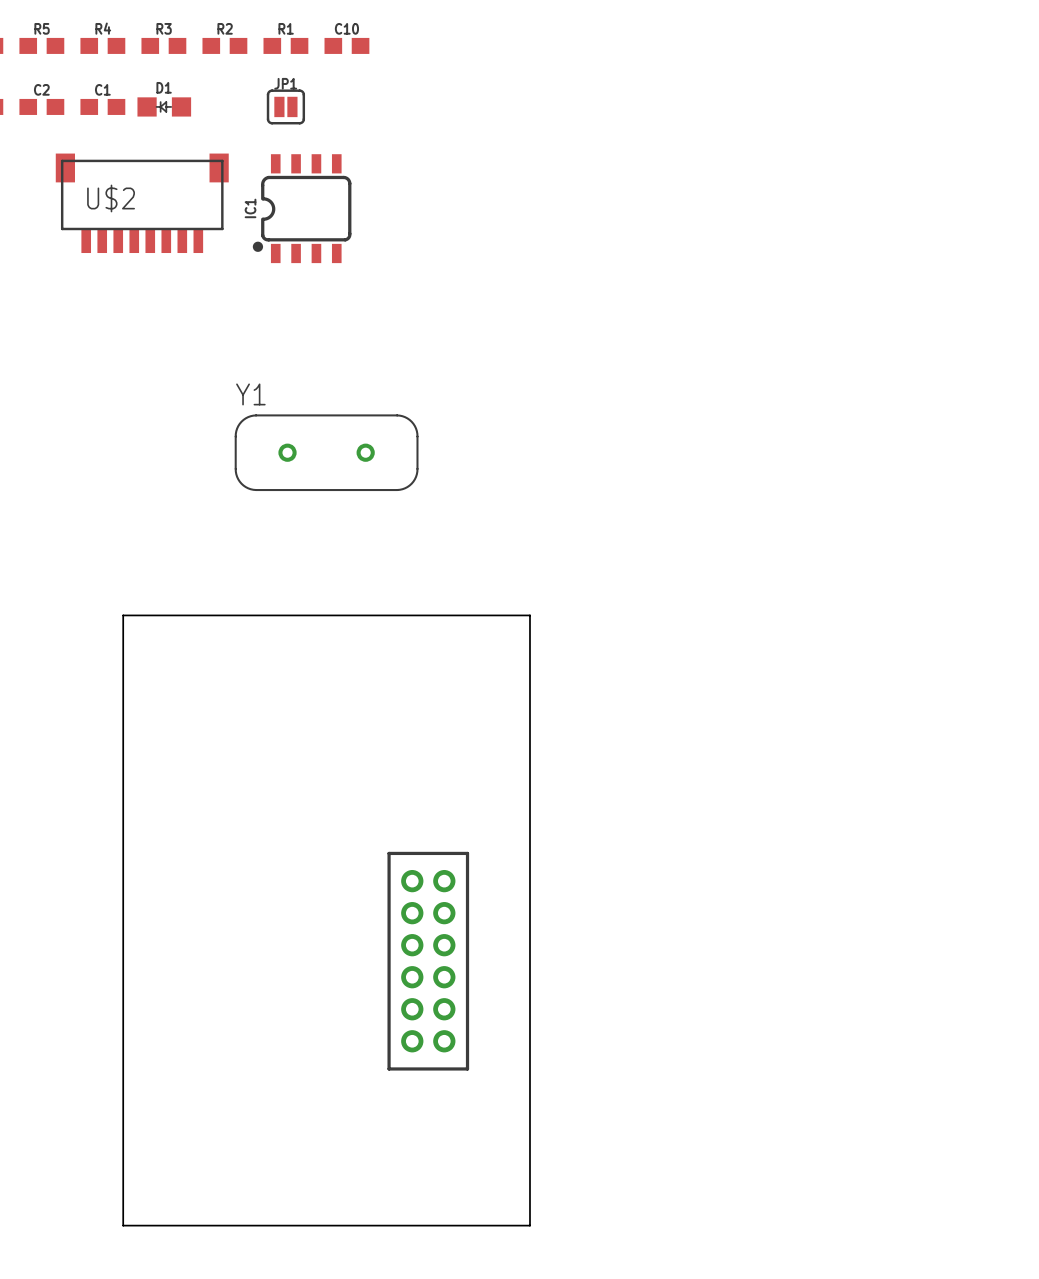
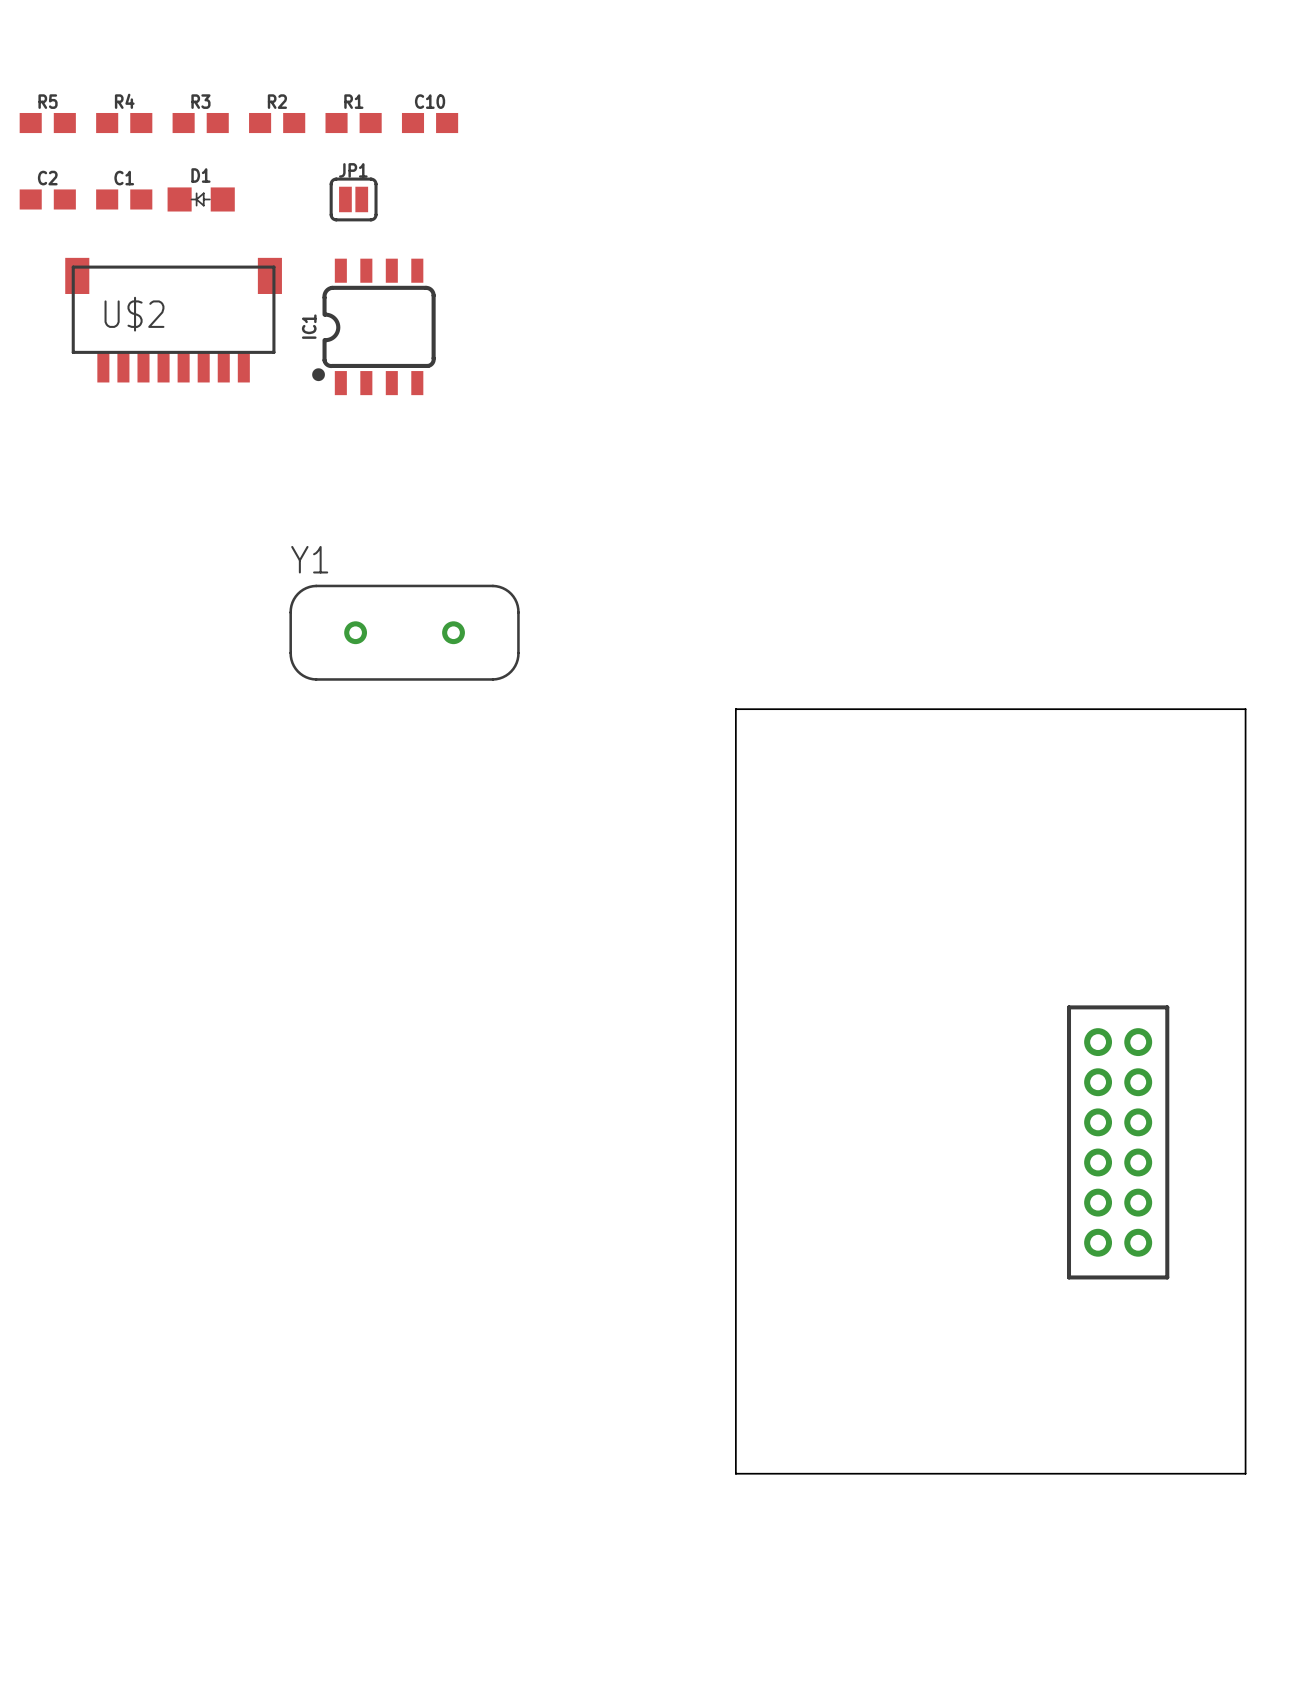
board edge: none -> (735, 709) (1245, 709) (1245, 1473) (735, 1473) (735, 709)
board edge: (123, 615) (529, 615) (529, 1225) (123, 1225) (123, 615) -> none
part: none -> (1118, 1142)
part: (428, 961) -> none

